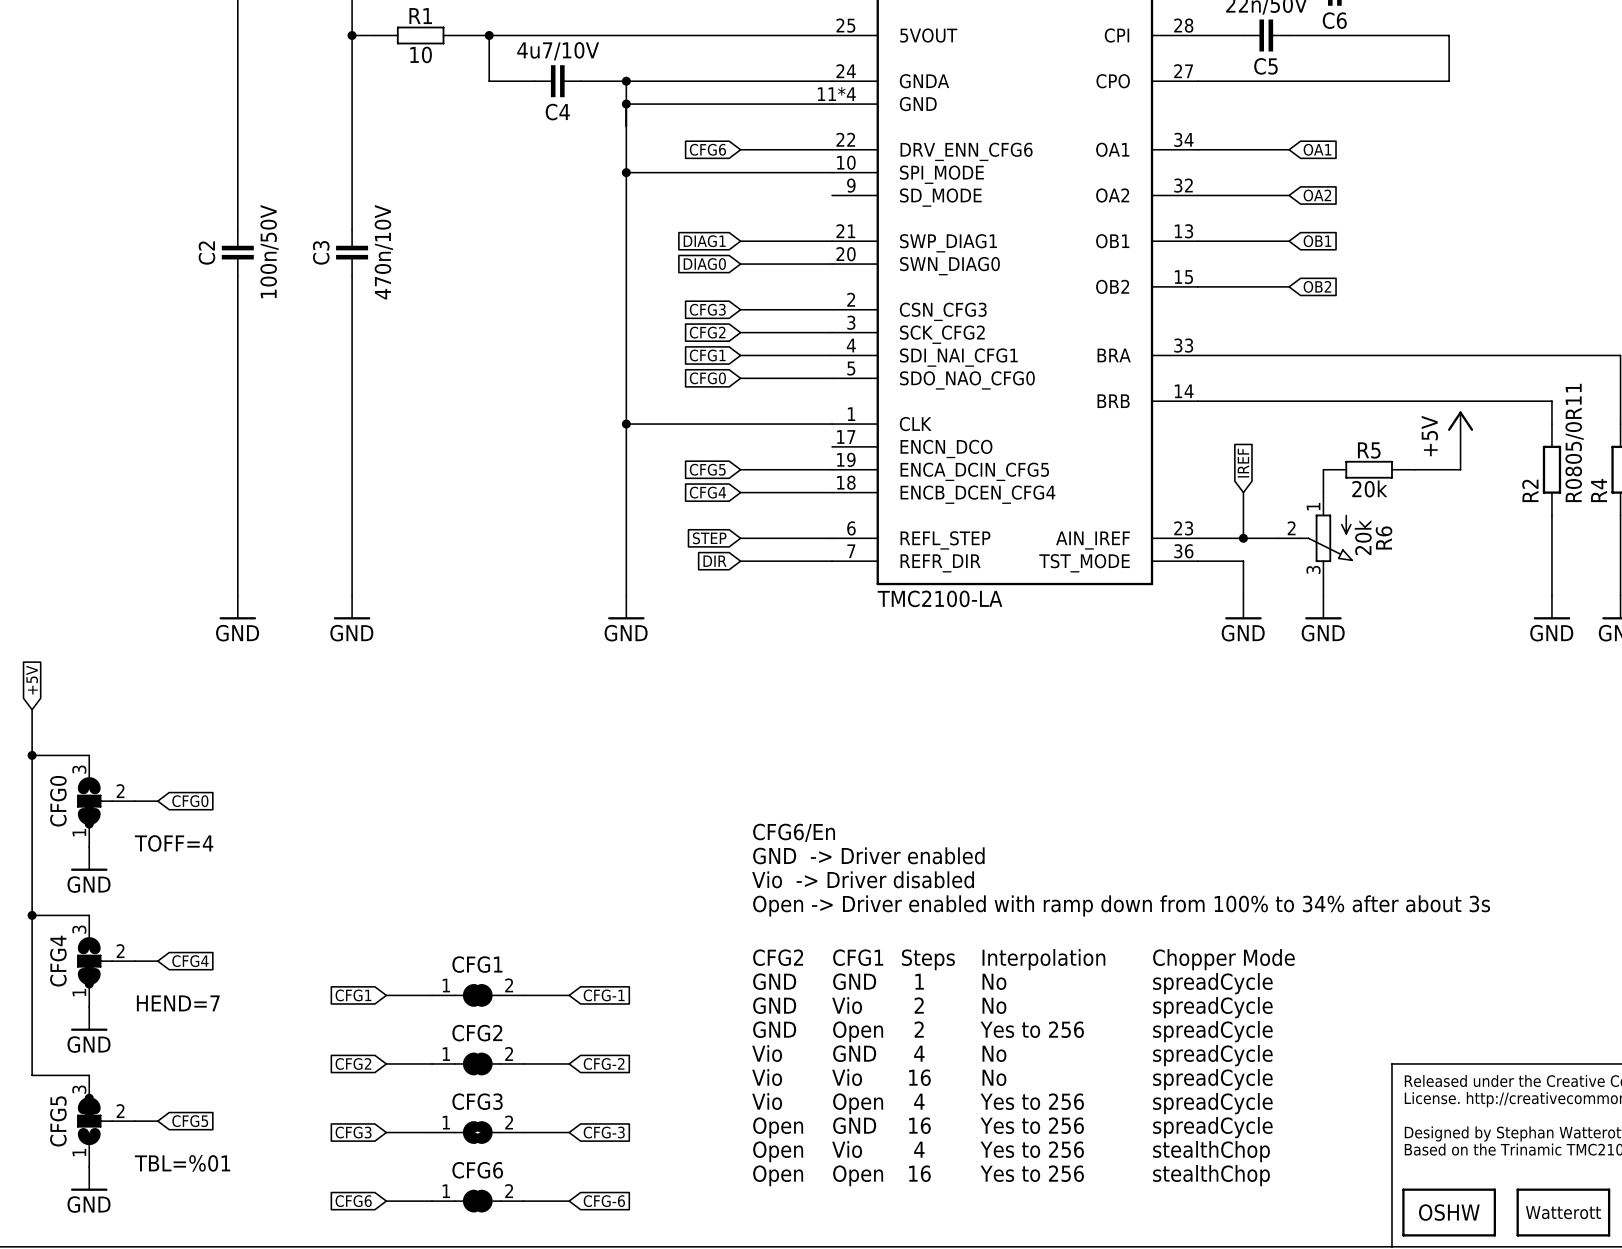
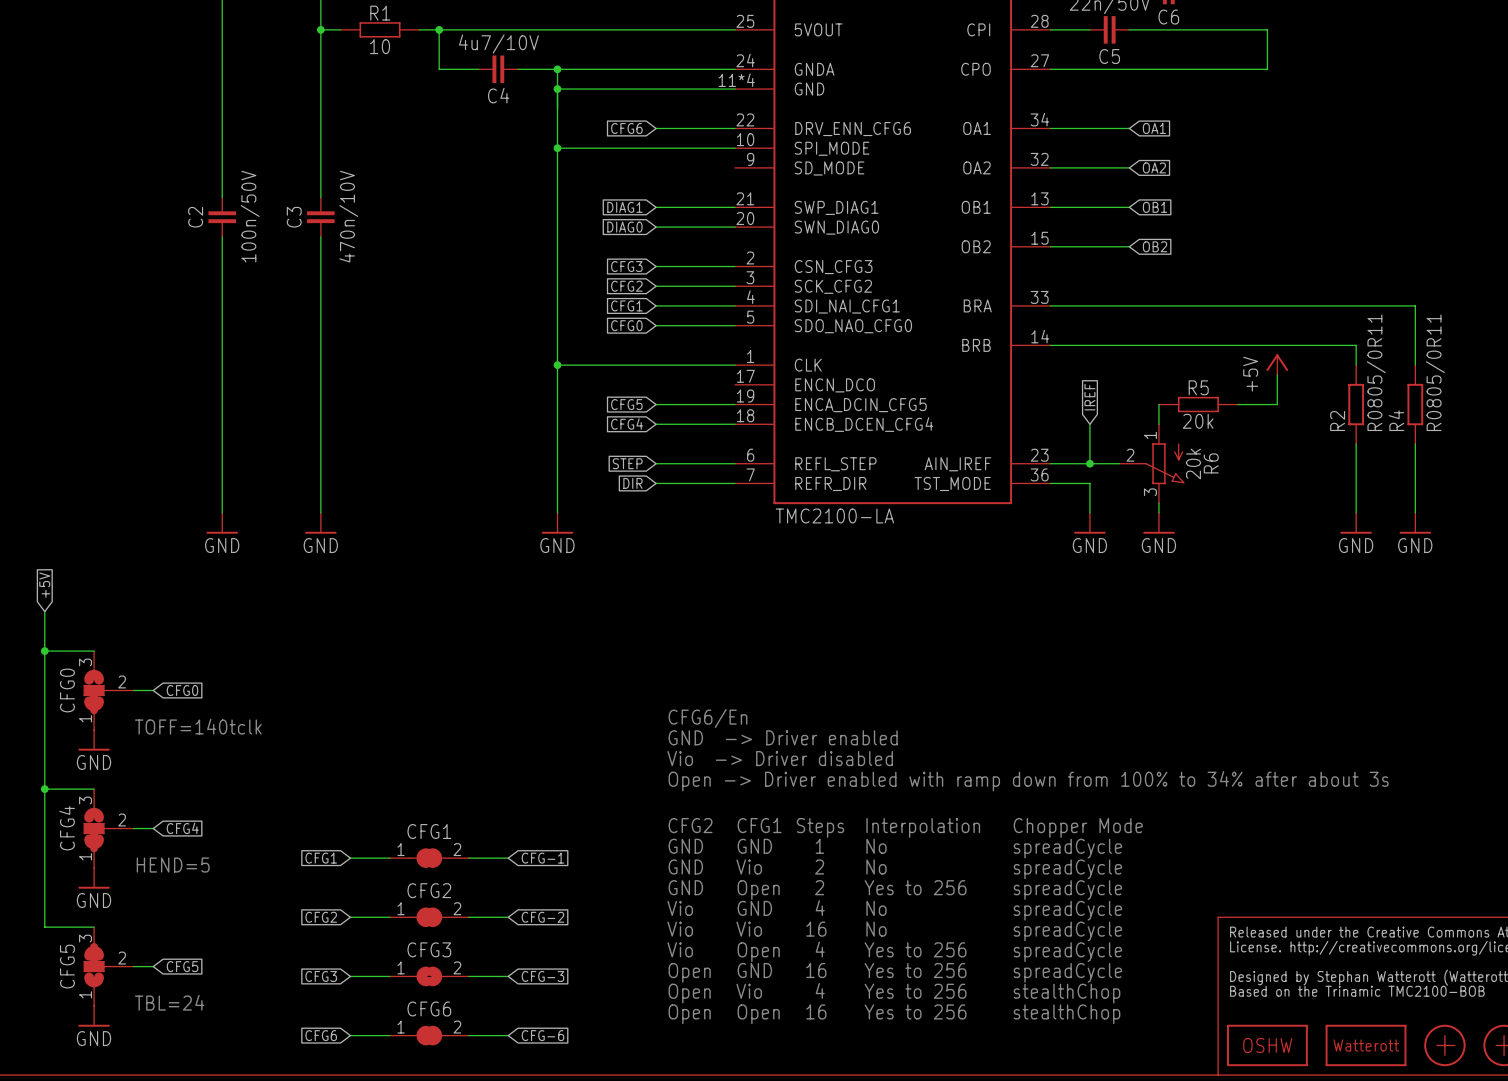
text: TOFF=4 (174, 843) -> TOFF=140tclk (198, 726)
text: HEND=7 (178, 1003) -> HEND=5 (173, 865)
text: TBL=%01 (182, 1163) -> TBL=24 (169, 1002)

